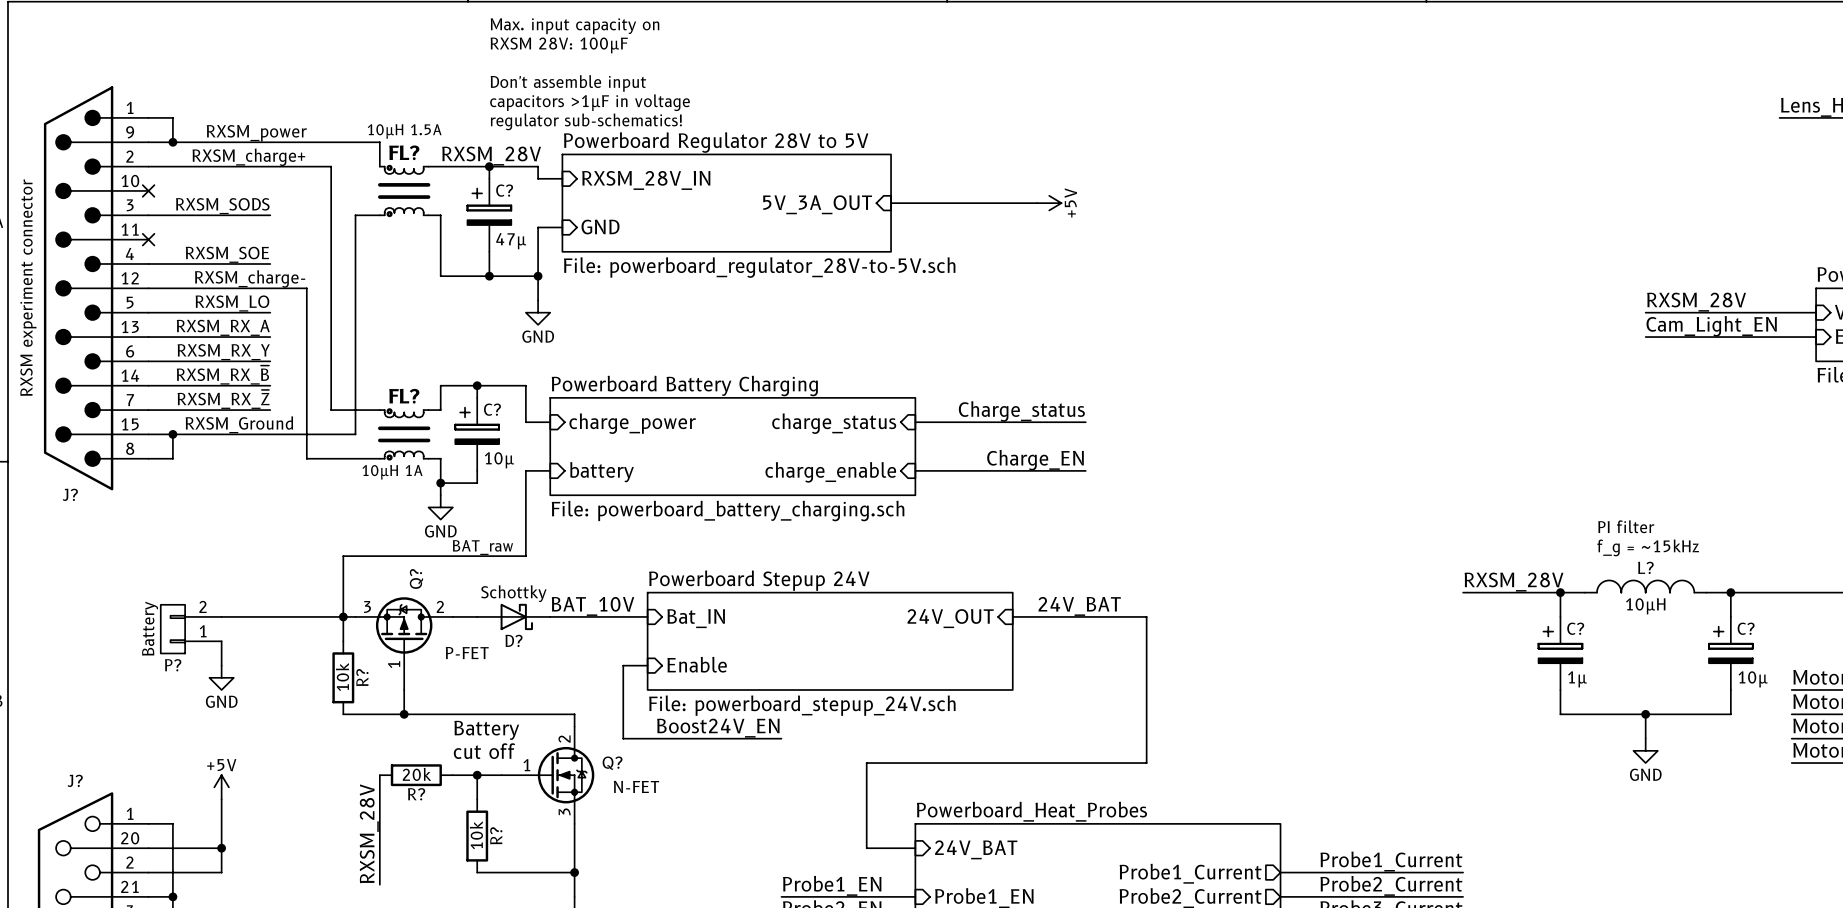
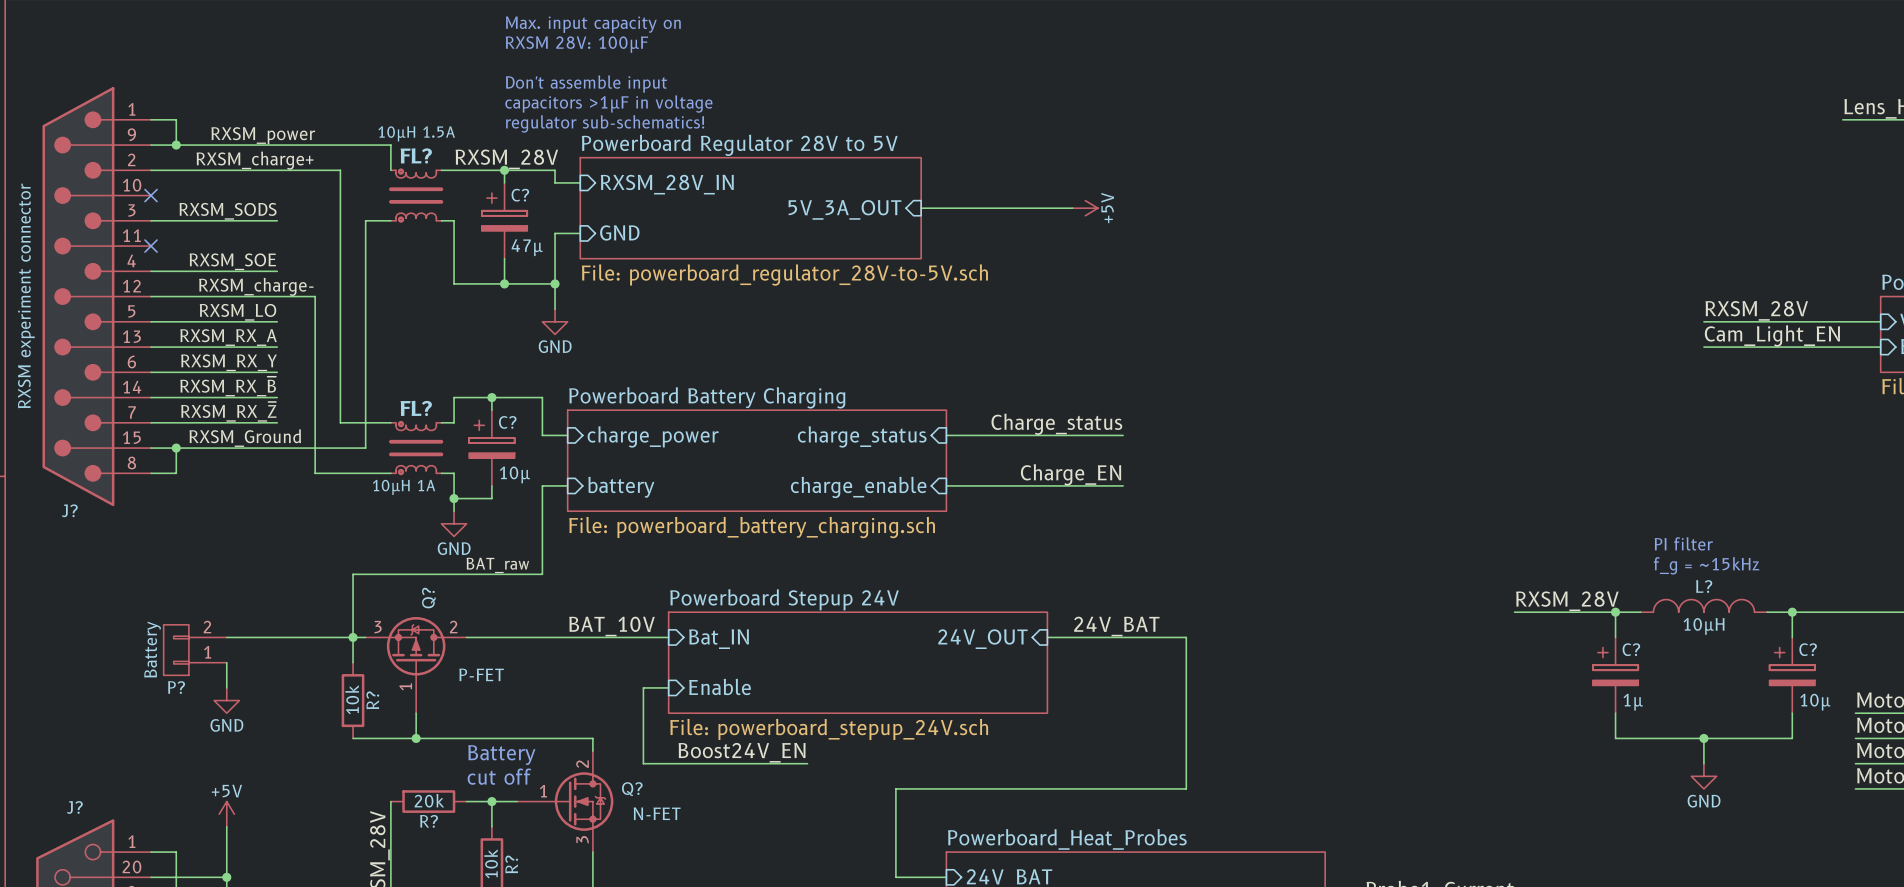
D?: Schottky (513, 616) -> none

